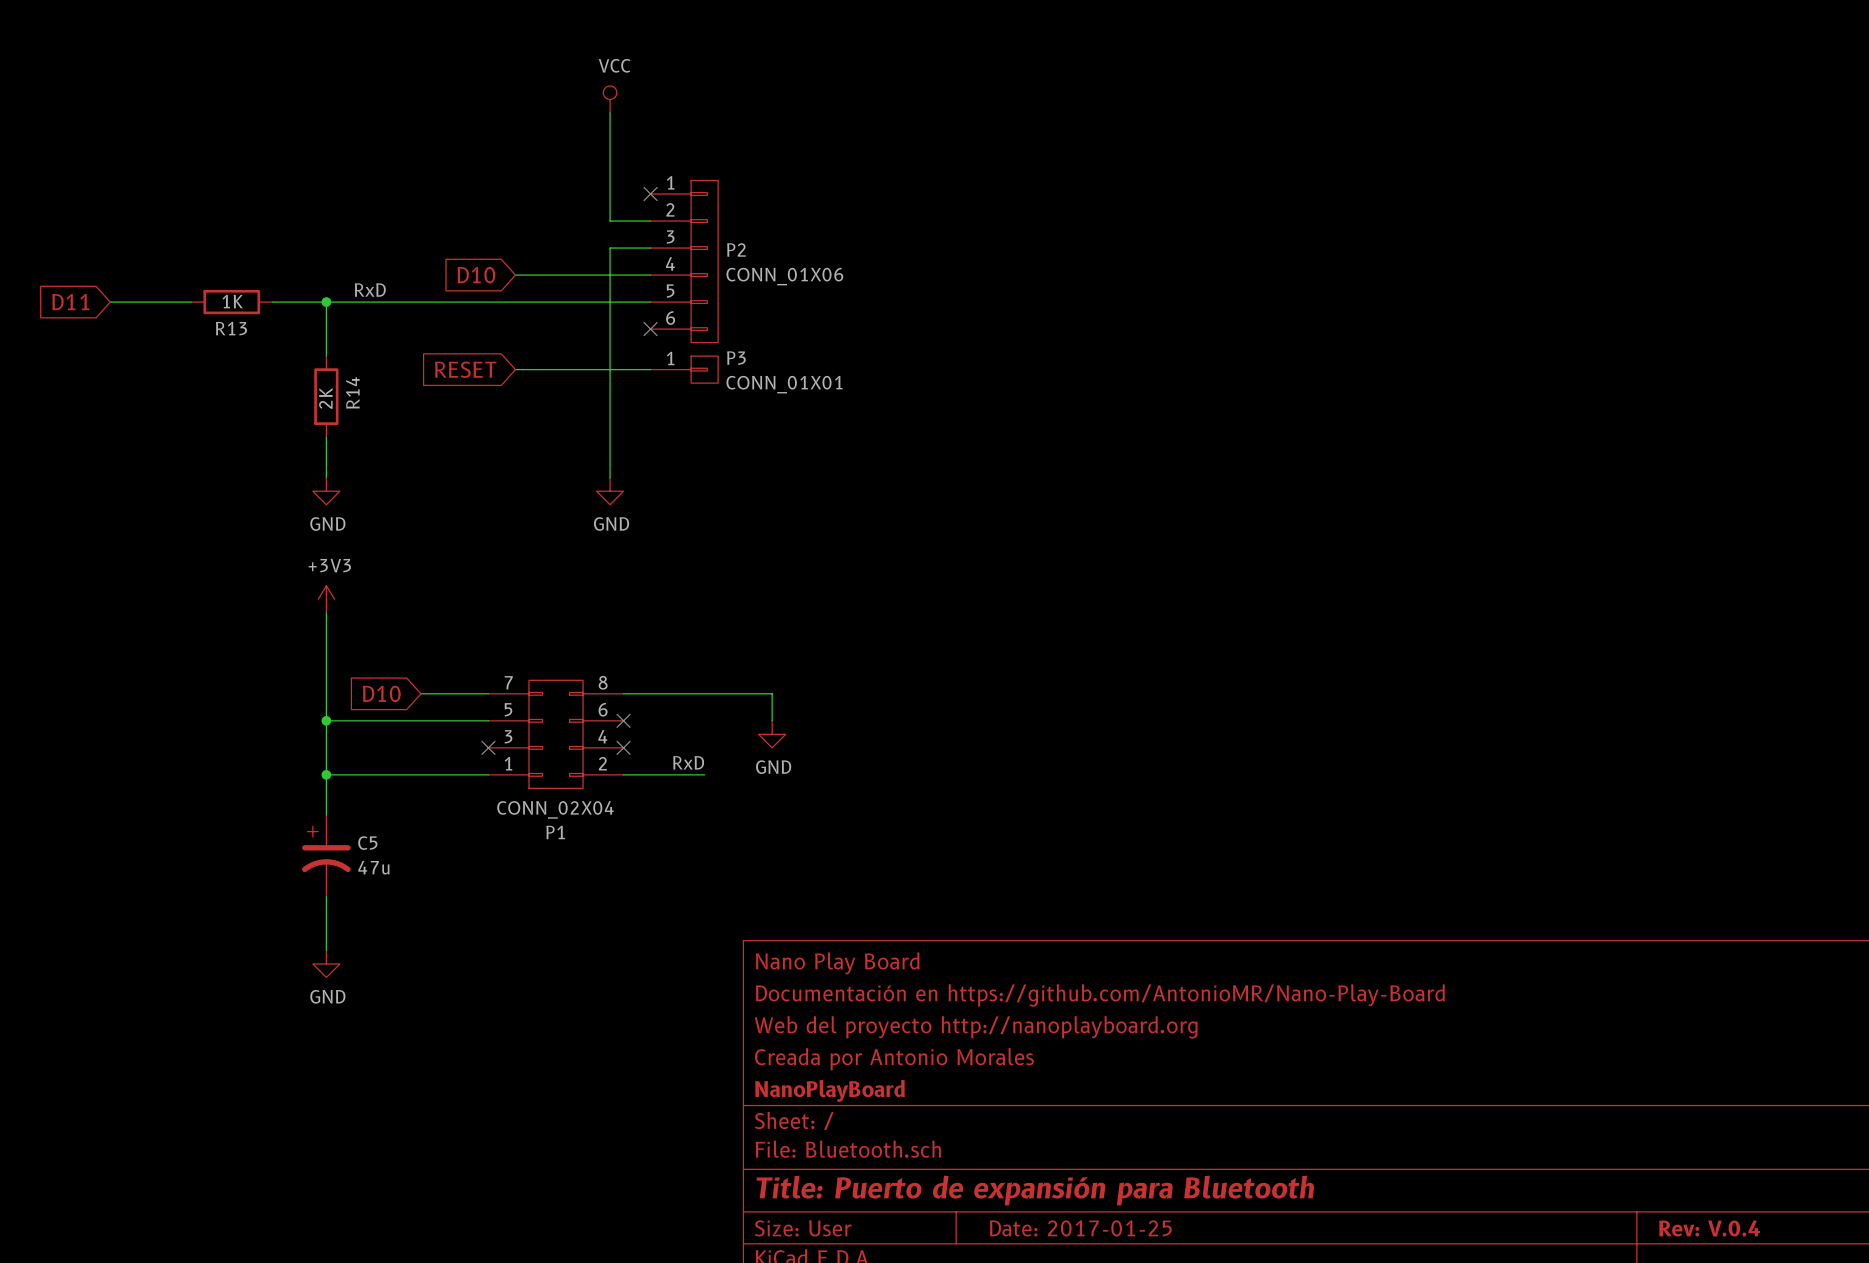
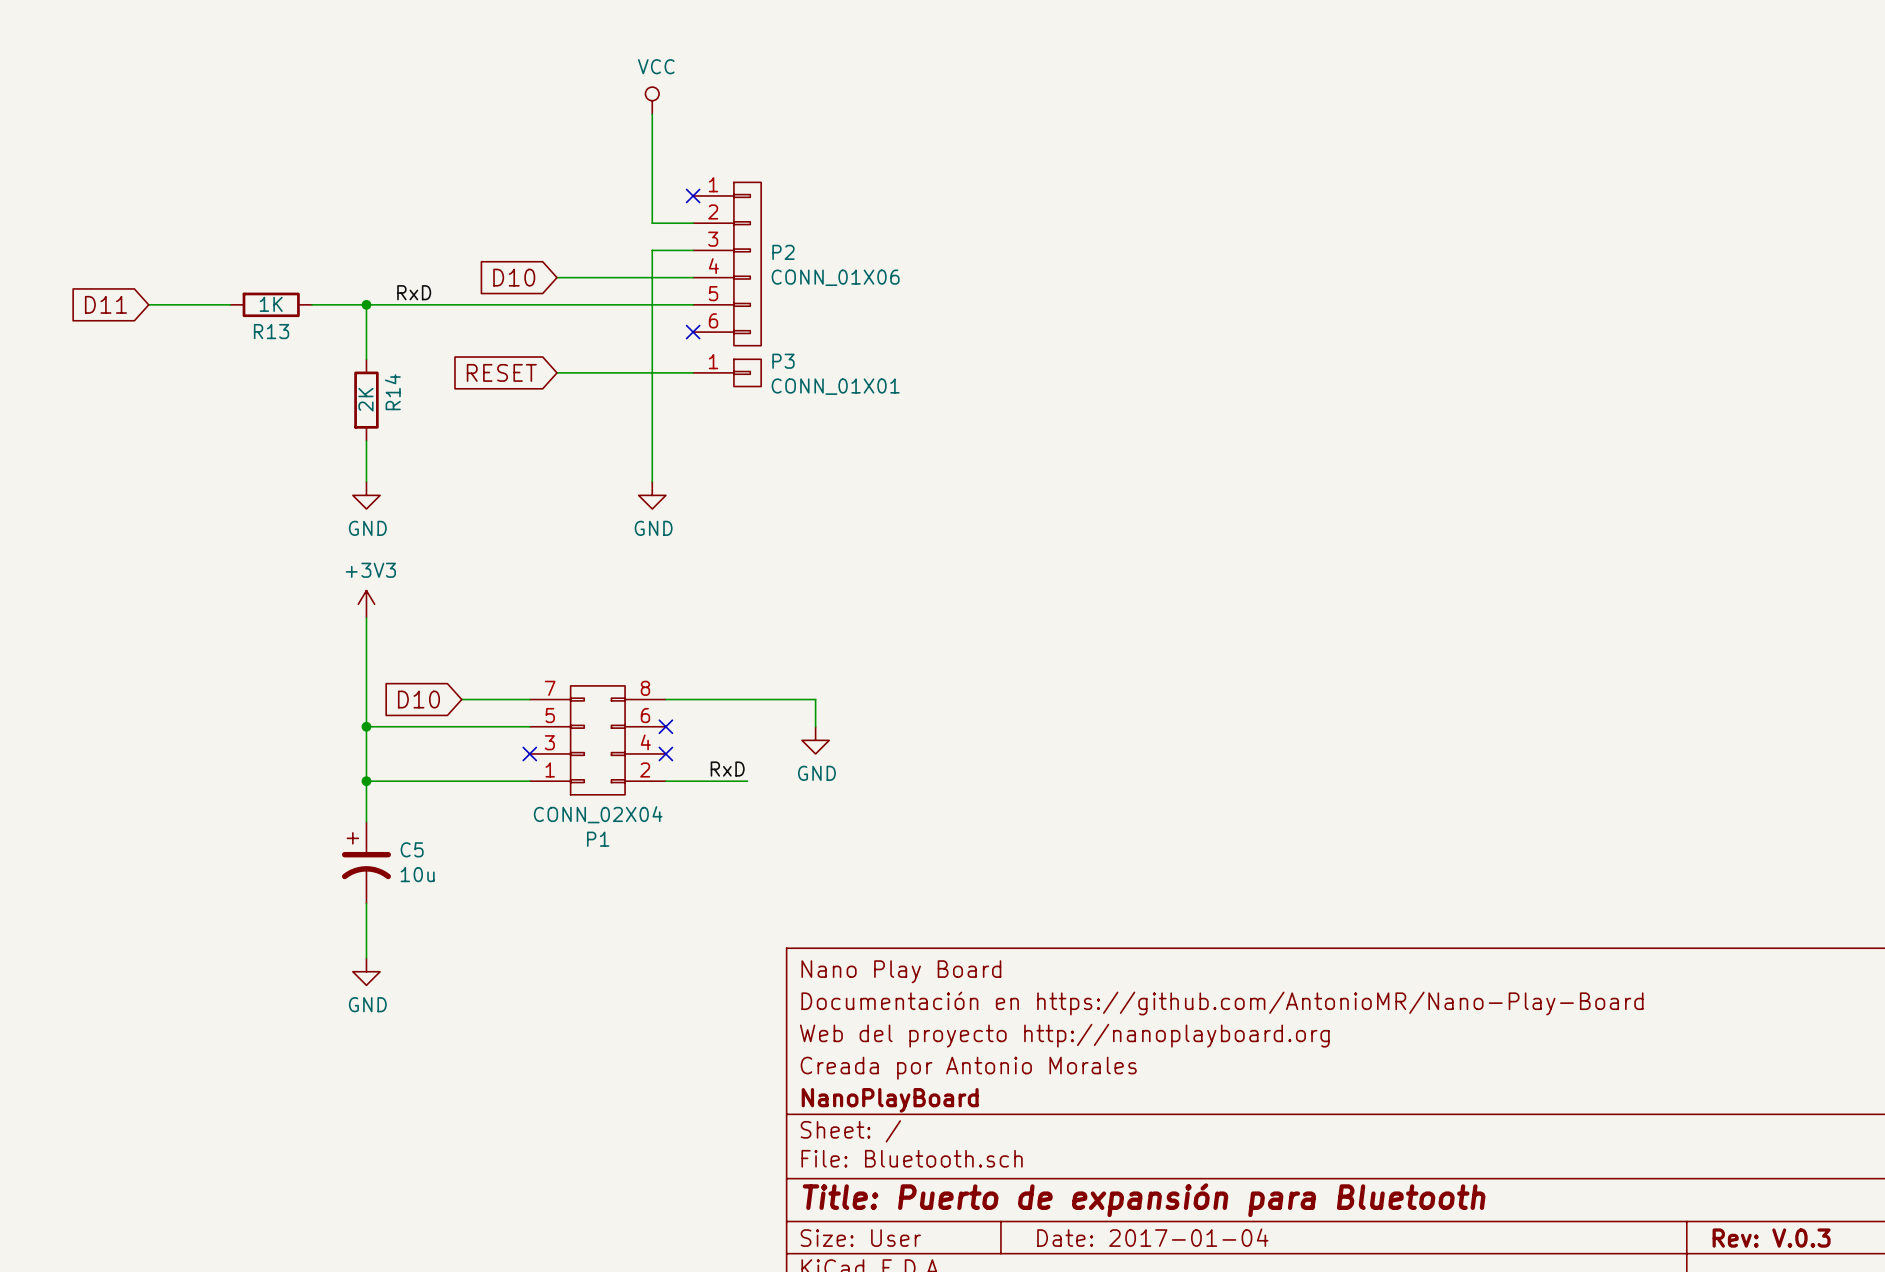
C5 value: 47u (373, 867) -> 10u (417, 874)
title block: Date: 2017-01-25 (1080, 1228) -> Date: 2017-01-04 (1152, 1237)
title block: Rev: V.0.4 (1709, 1228) -> Rev: V.0.3 (1771, 1238)

